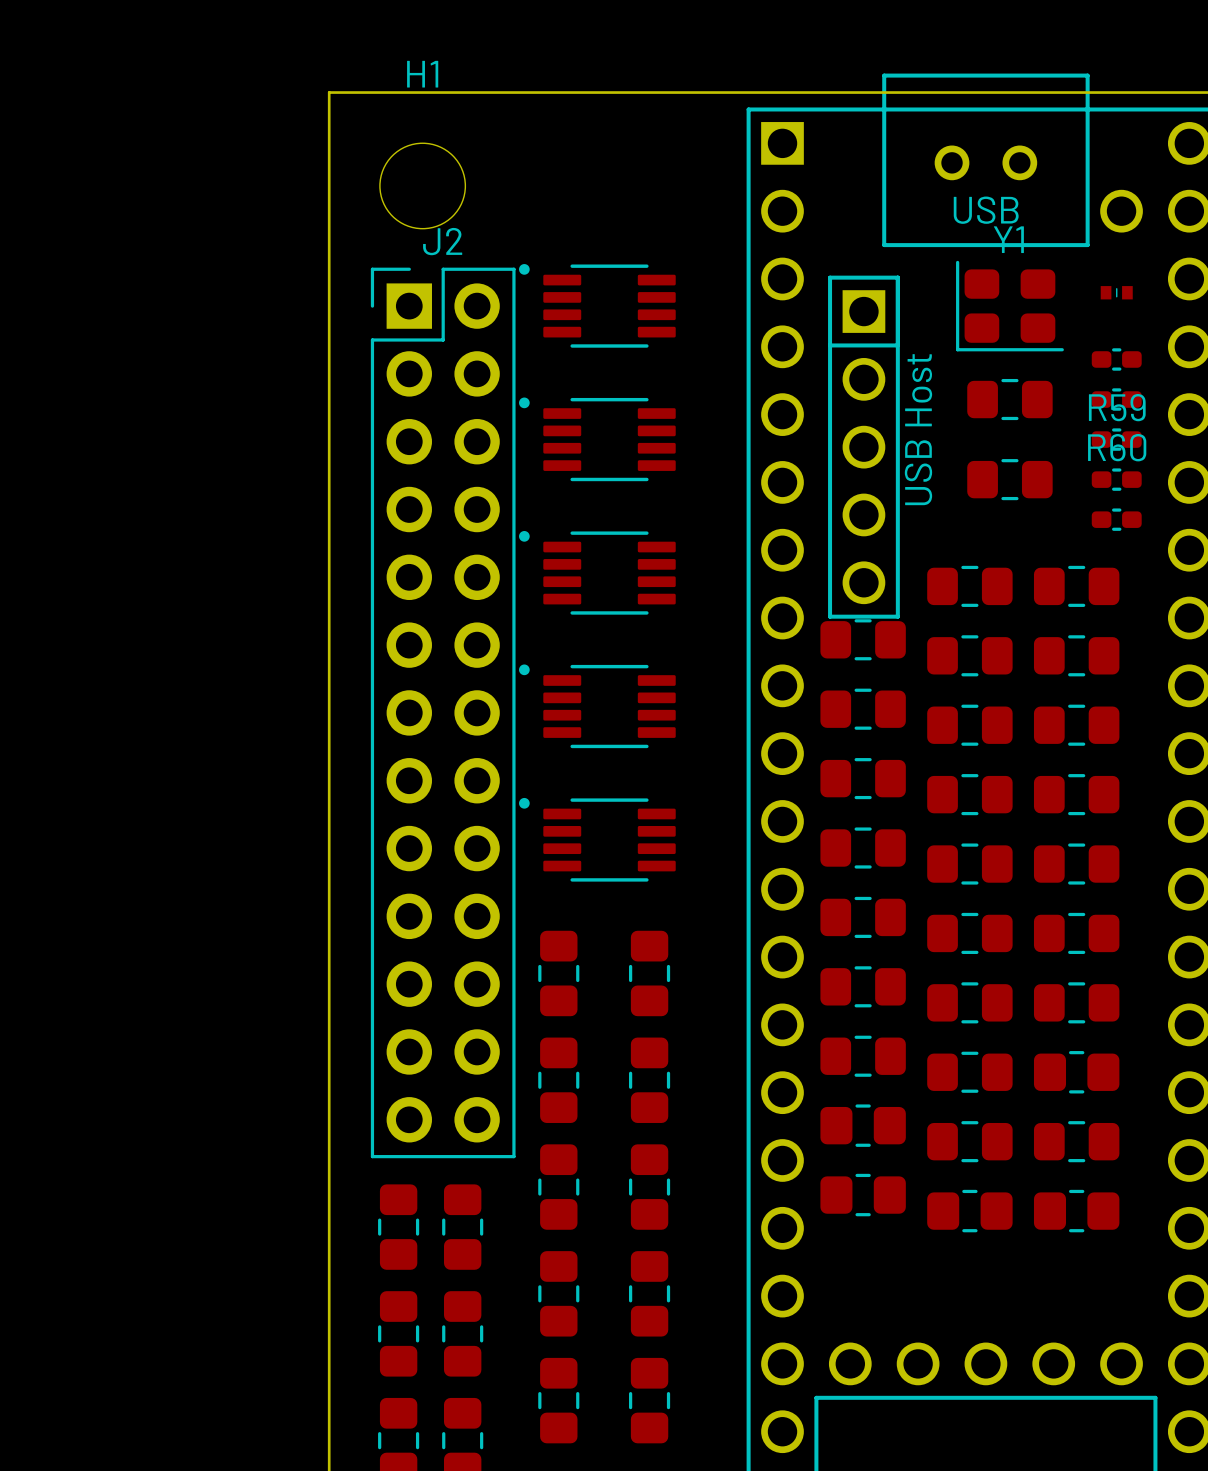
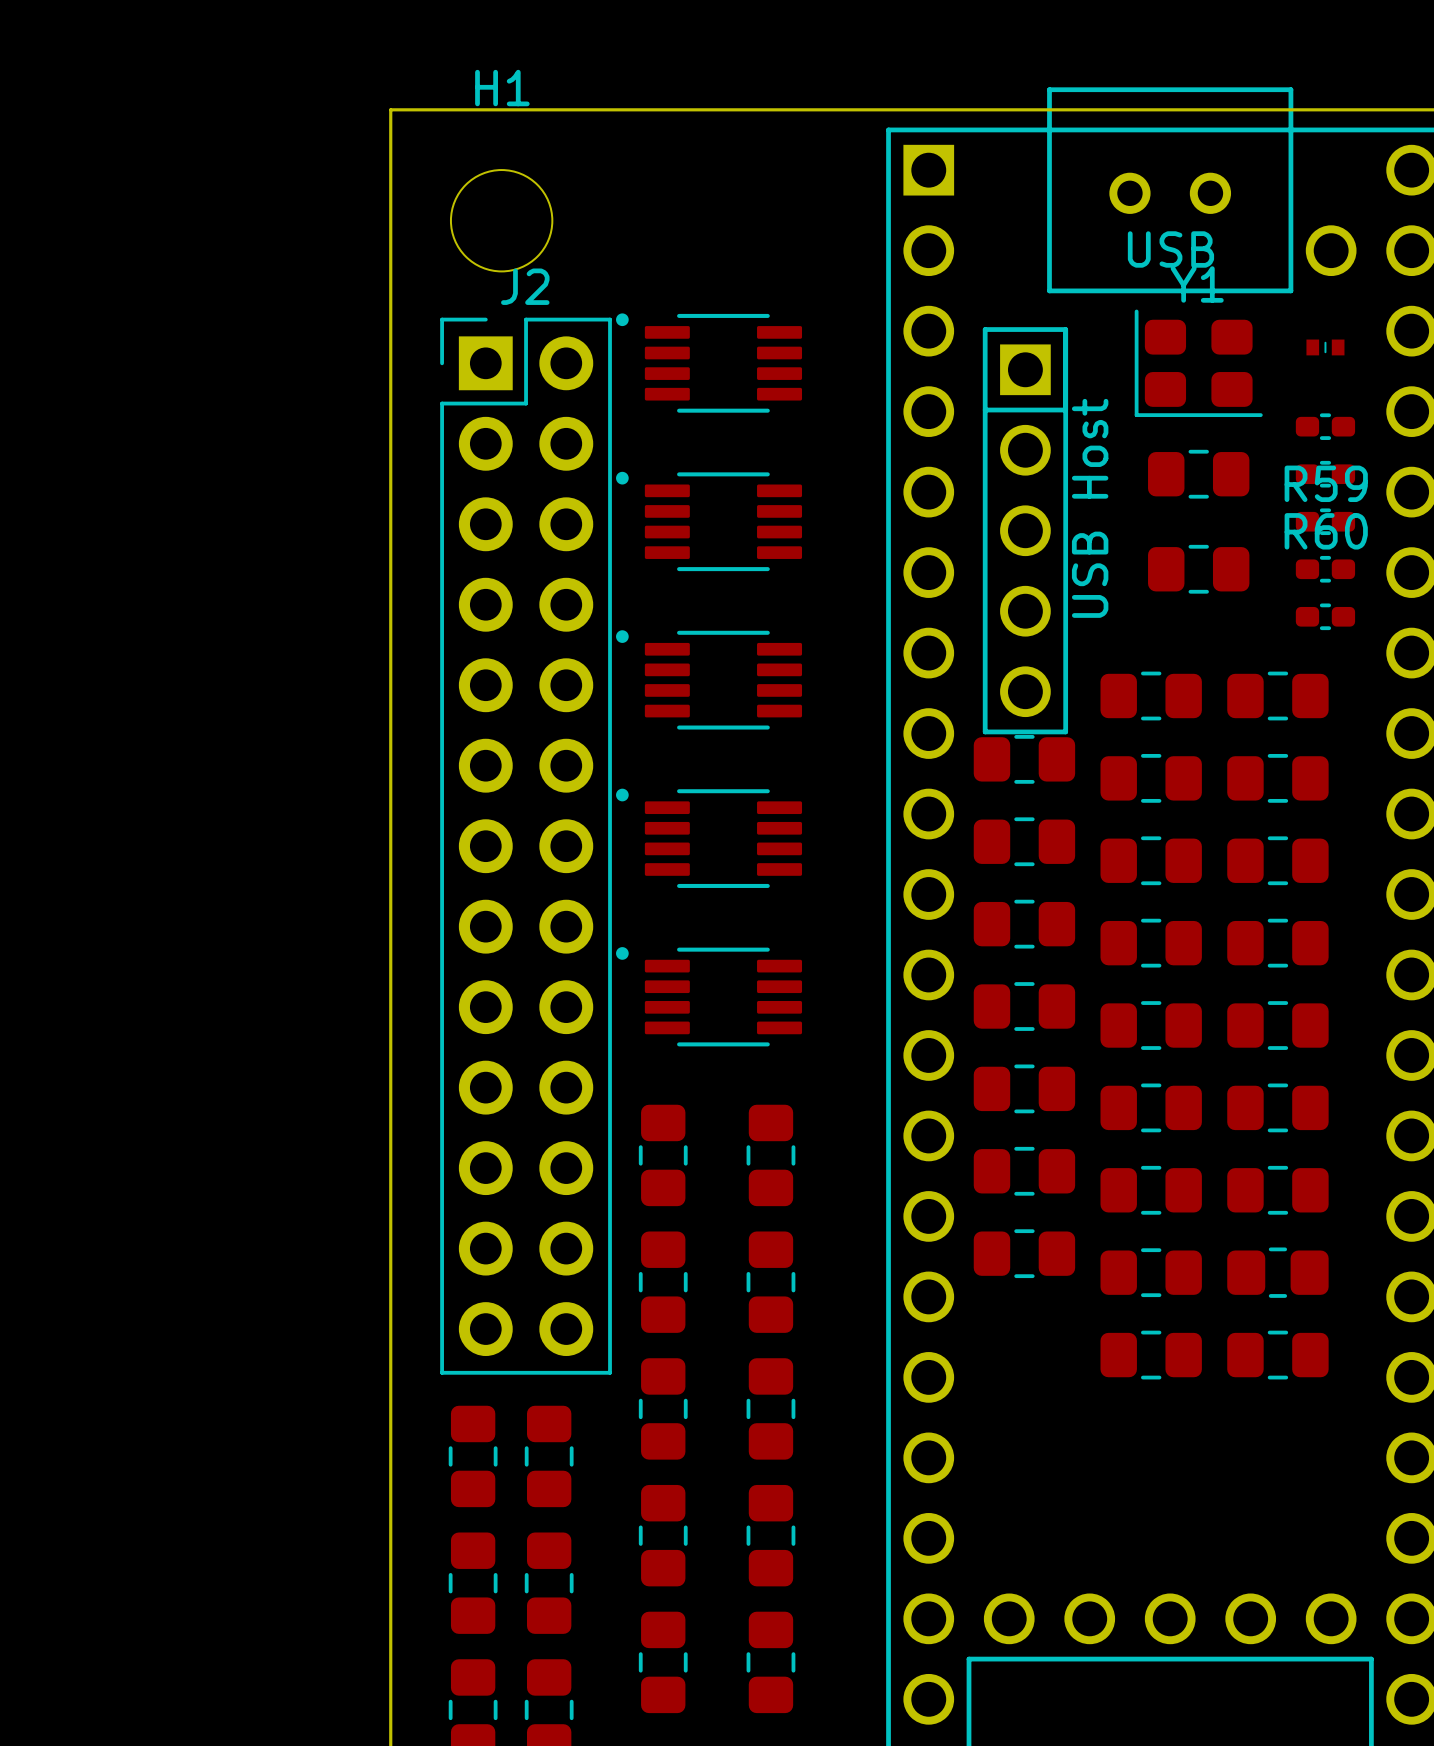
part: (863, 1125) -> none
part: (863, 1195) -> none
part: (969, 1211) -> none
part: (1076, 1211) -> none

